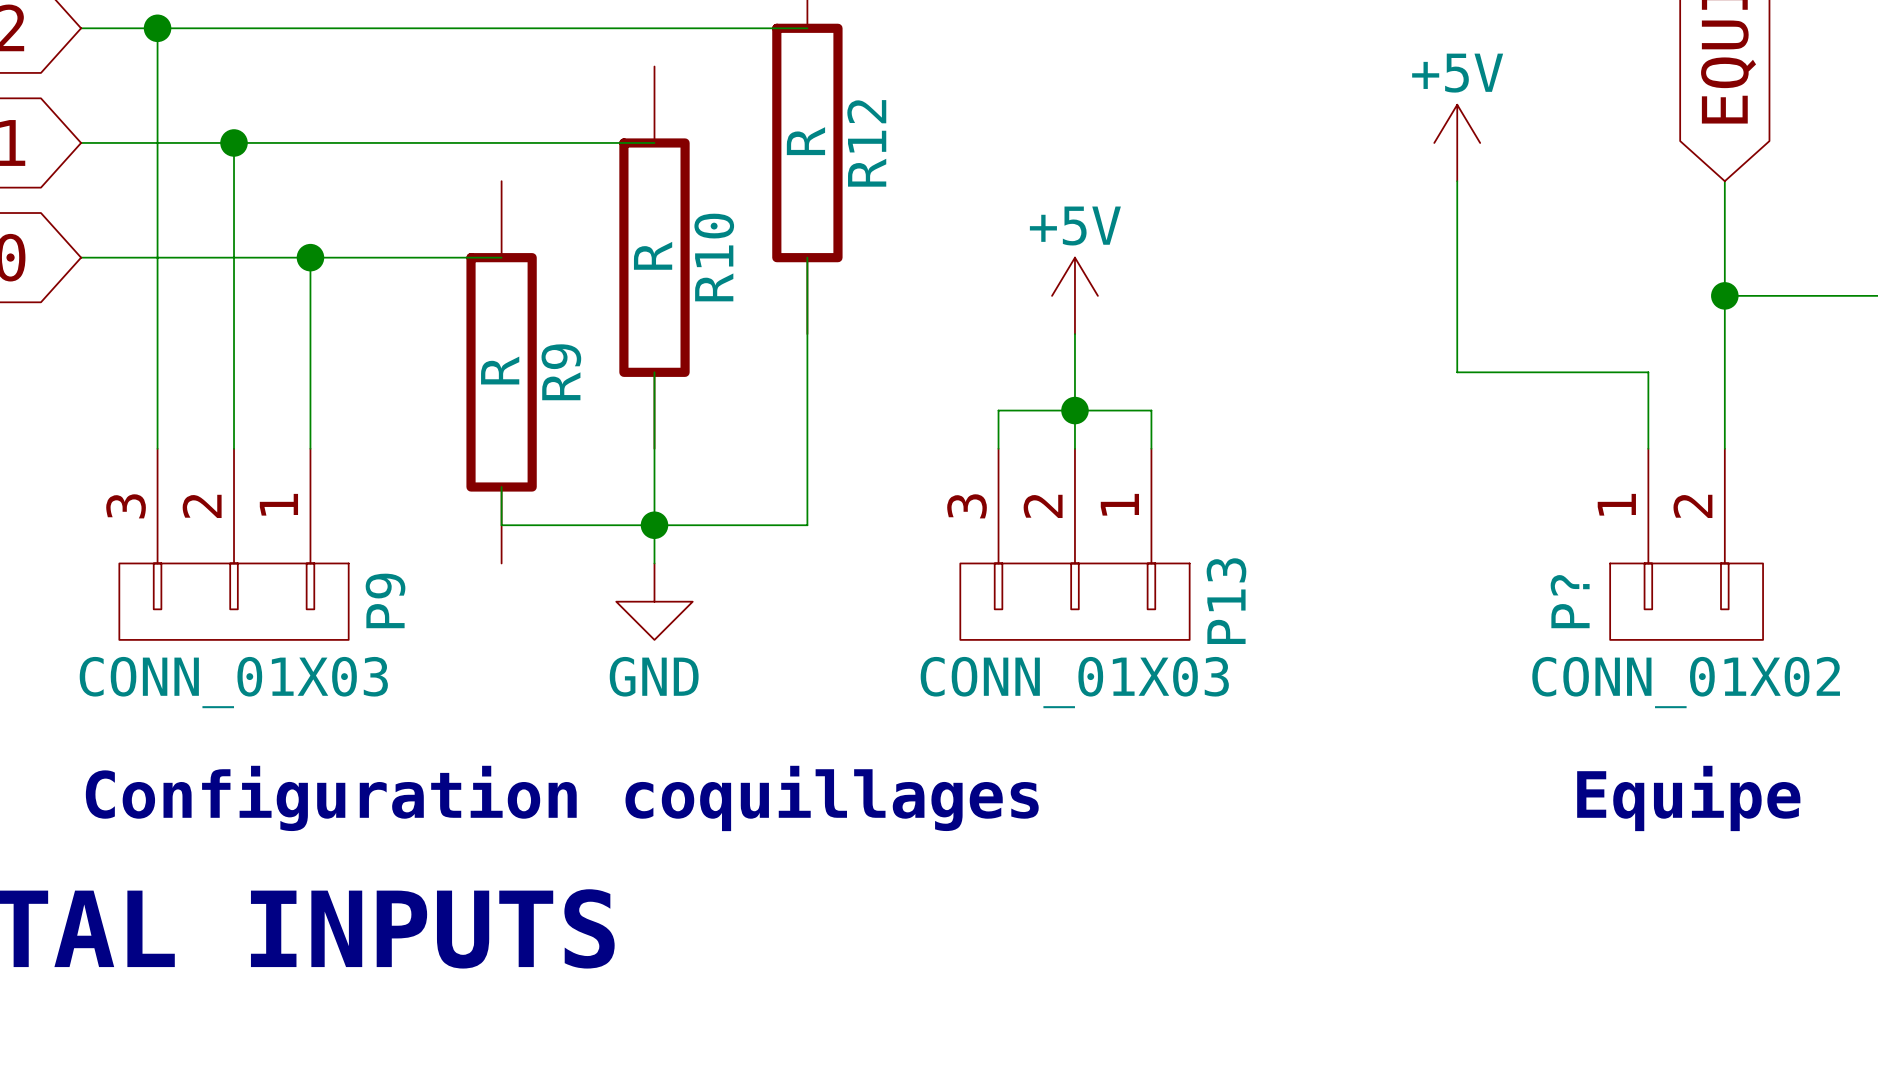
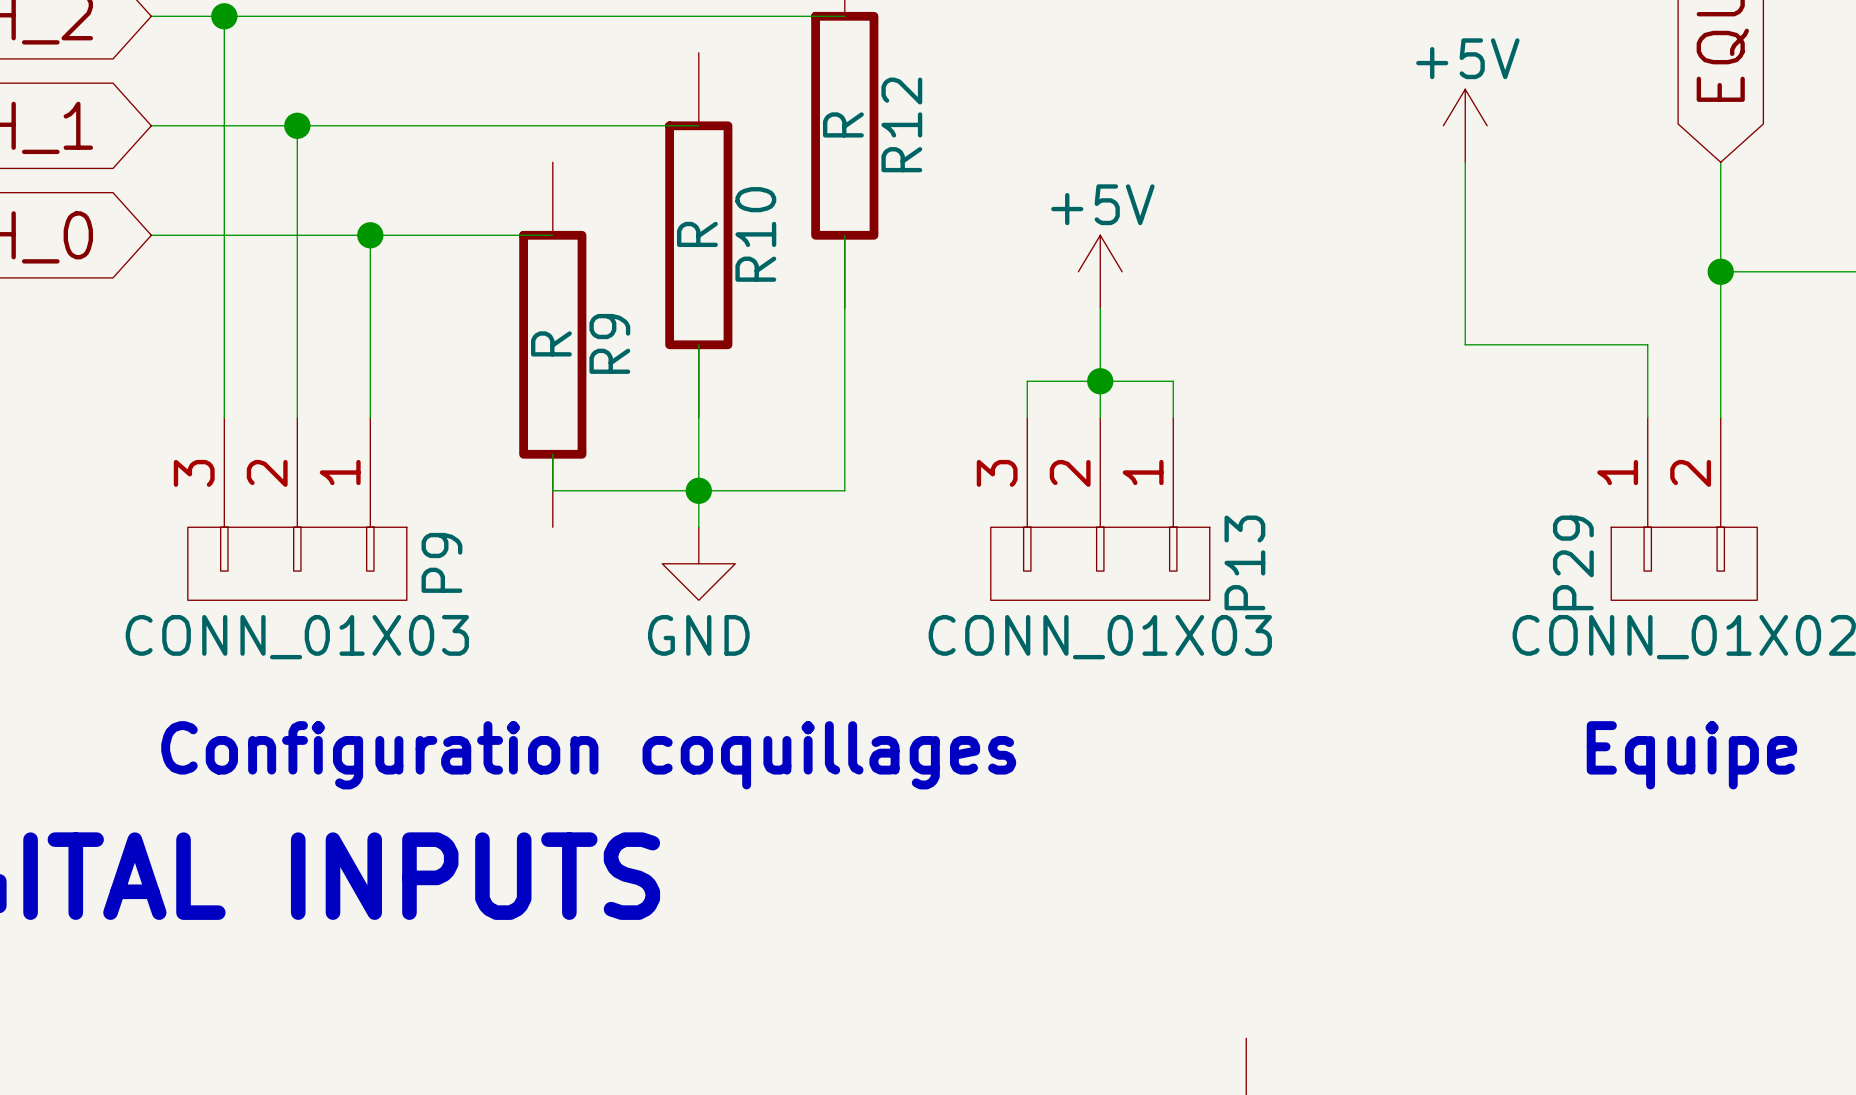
P? name: P? (1570, 601) -> P29 (1573, 562)

